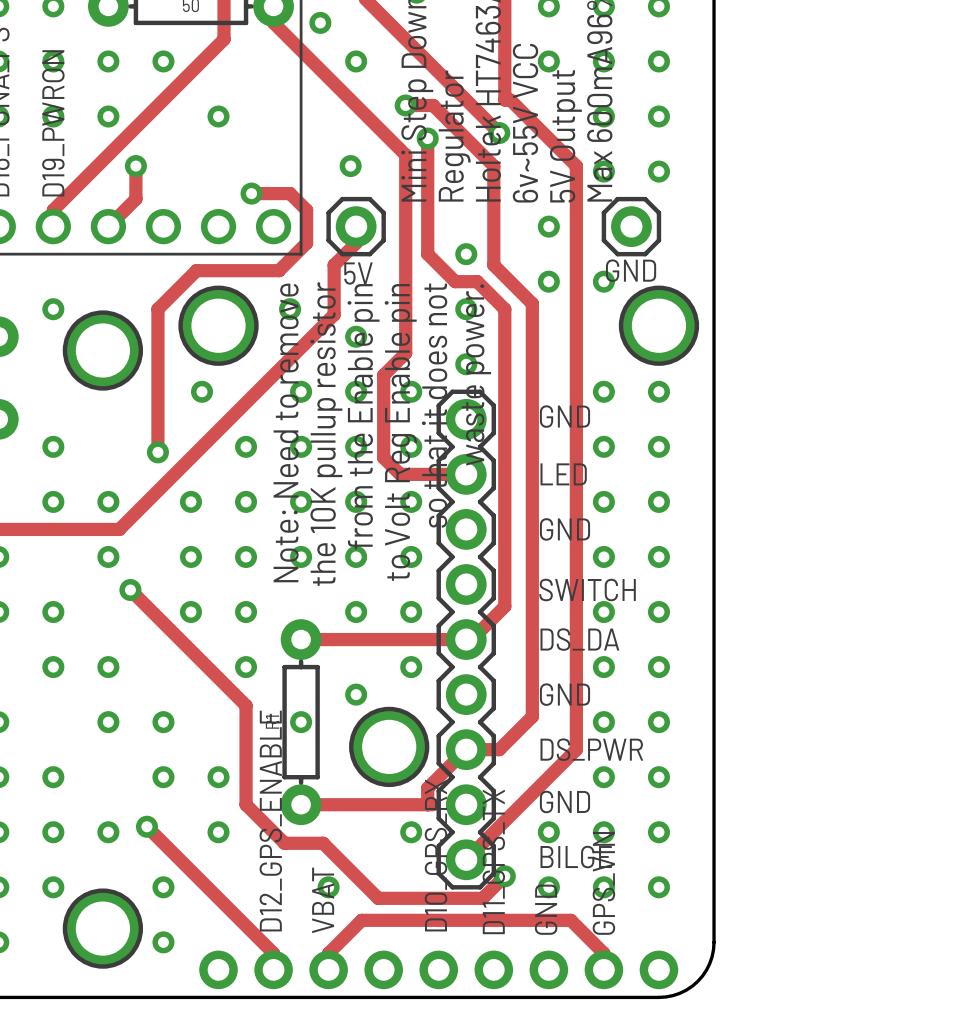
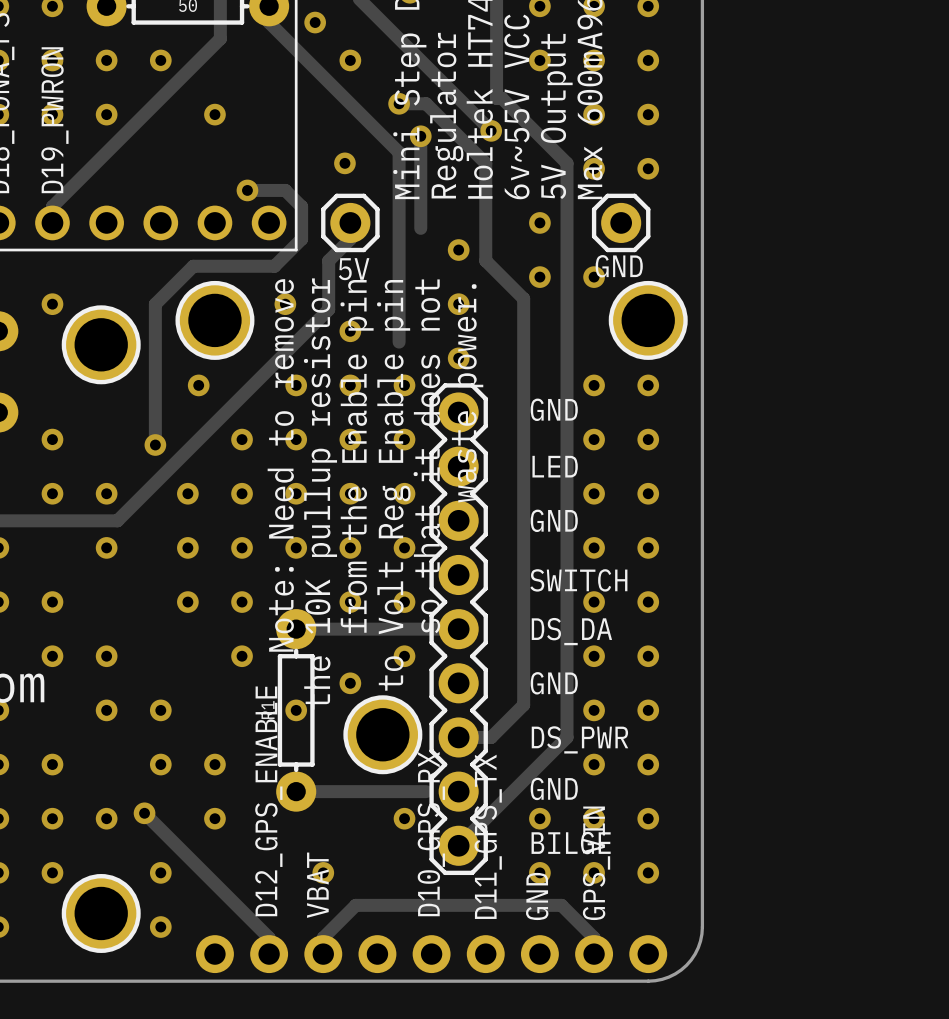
track: (135, 166) (135, 199) (108, 226) -> none
via: (135, 166) -> none
track: (427, 232) (427, 254) (455, 281) (477, 281) (504, 309) (504, 606) (471, 639) (466, 639) -> none
track: (405, 347) (405, 353) (383, 375) (383, 457) (400, 474) (466, 474) -> none
track: (130, 590) (246, 705) (246, 804) (284, 843) (323, 843) (378, 898) (482, 898) (504, 876) -> none
via: (130, 590) -> none
track: (466, 749) (427, 788) (427, 804) -> none
via: (504, 876) -> none

